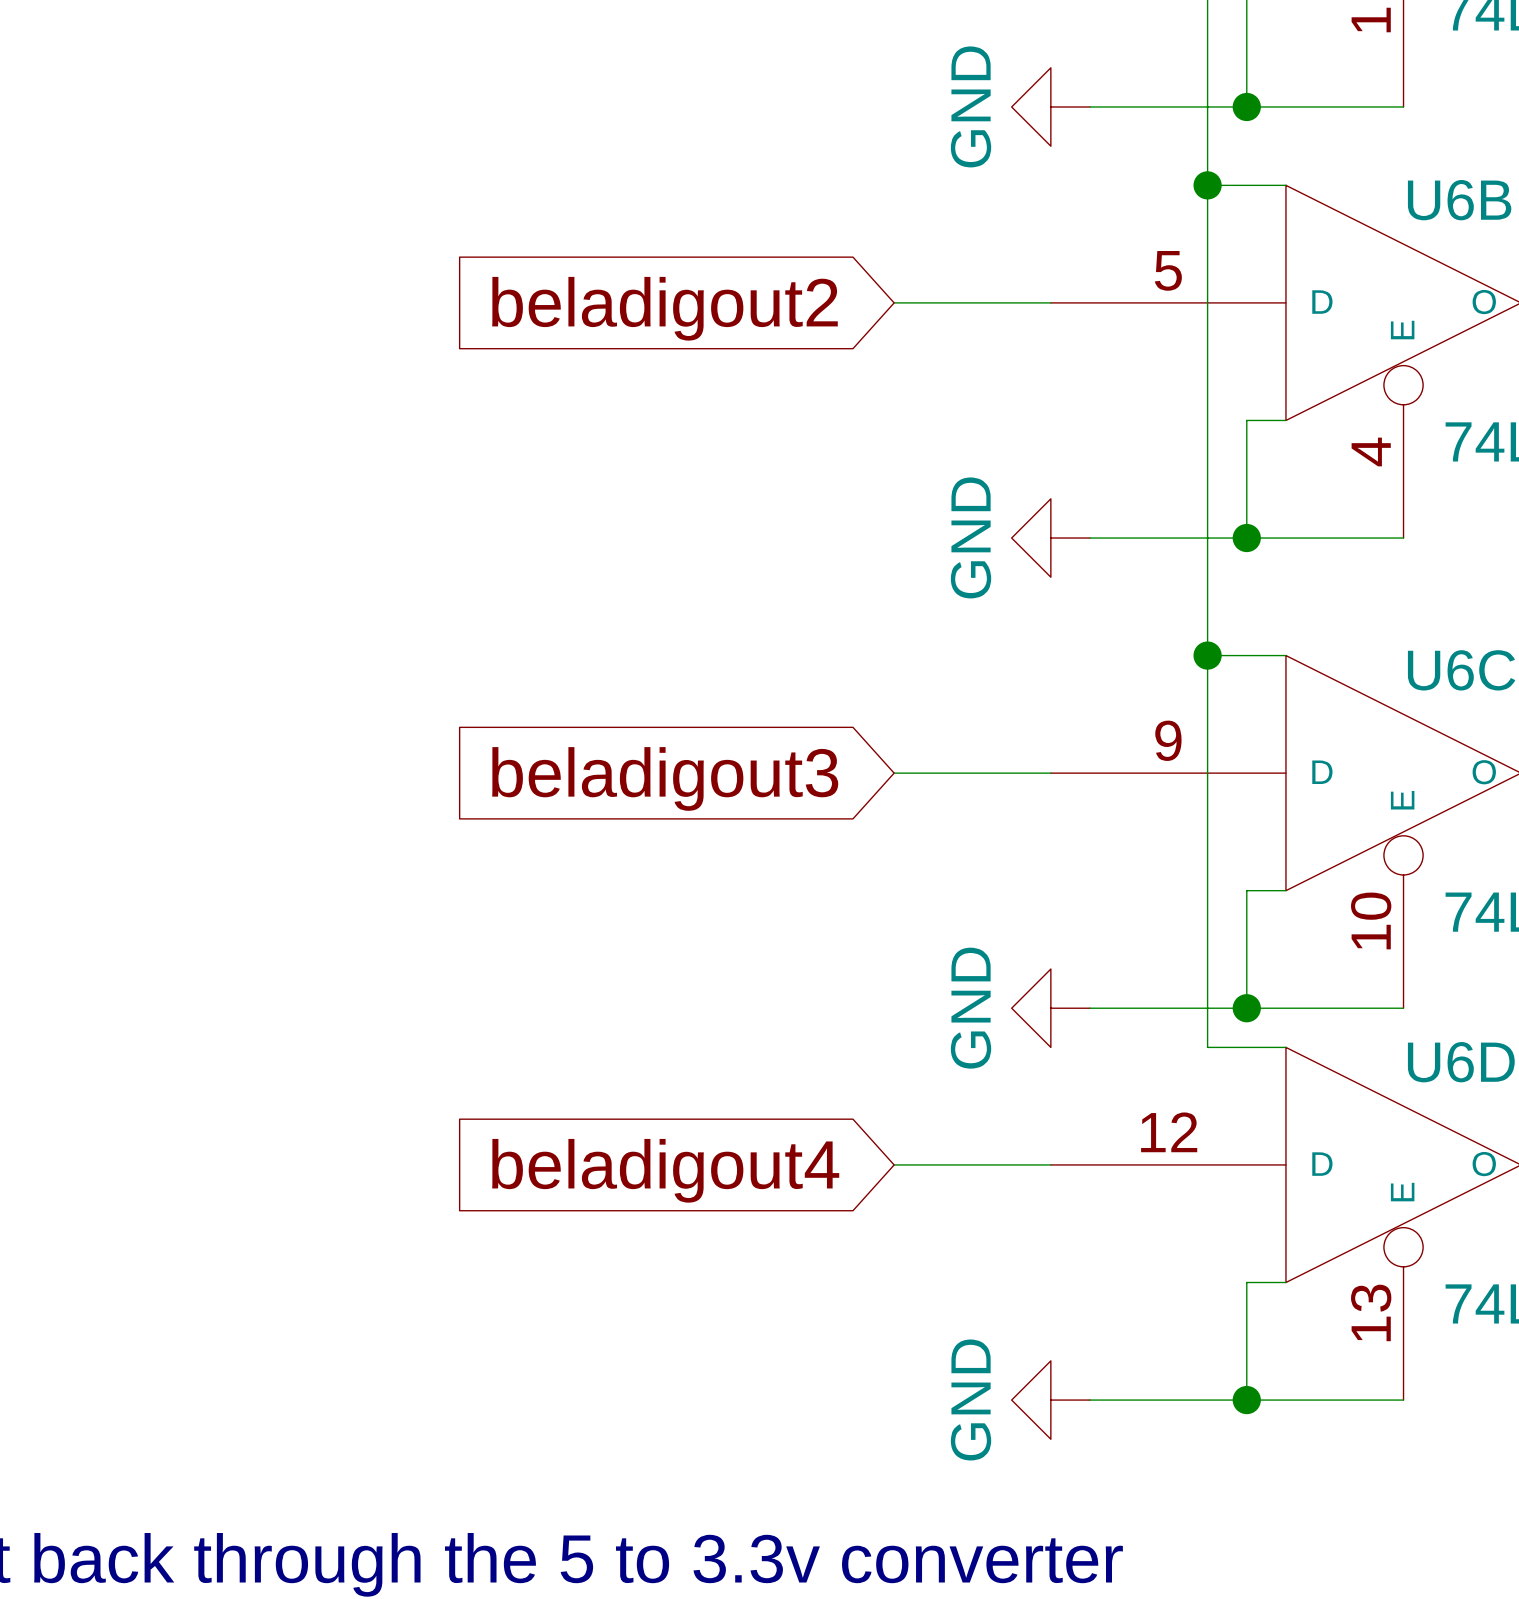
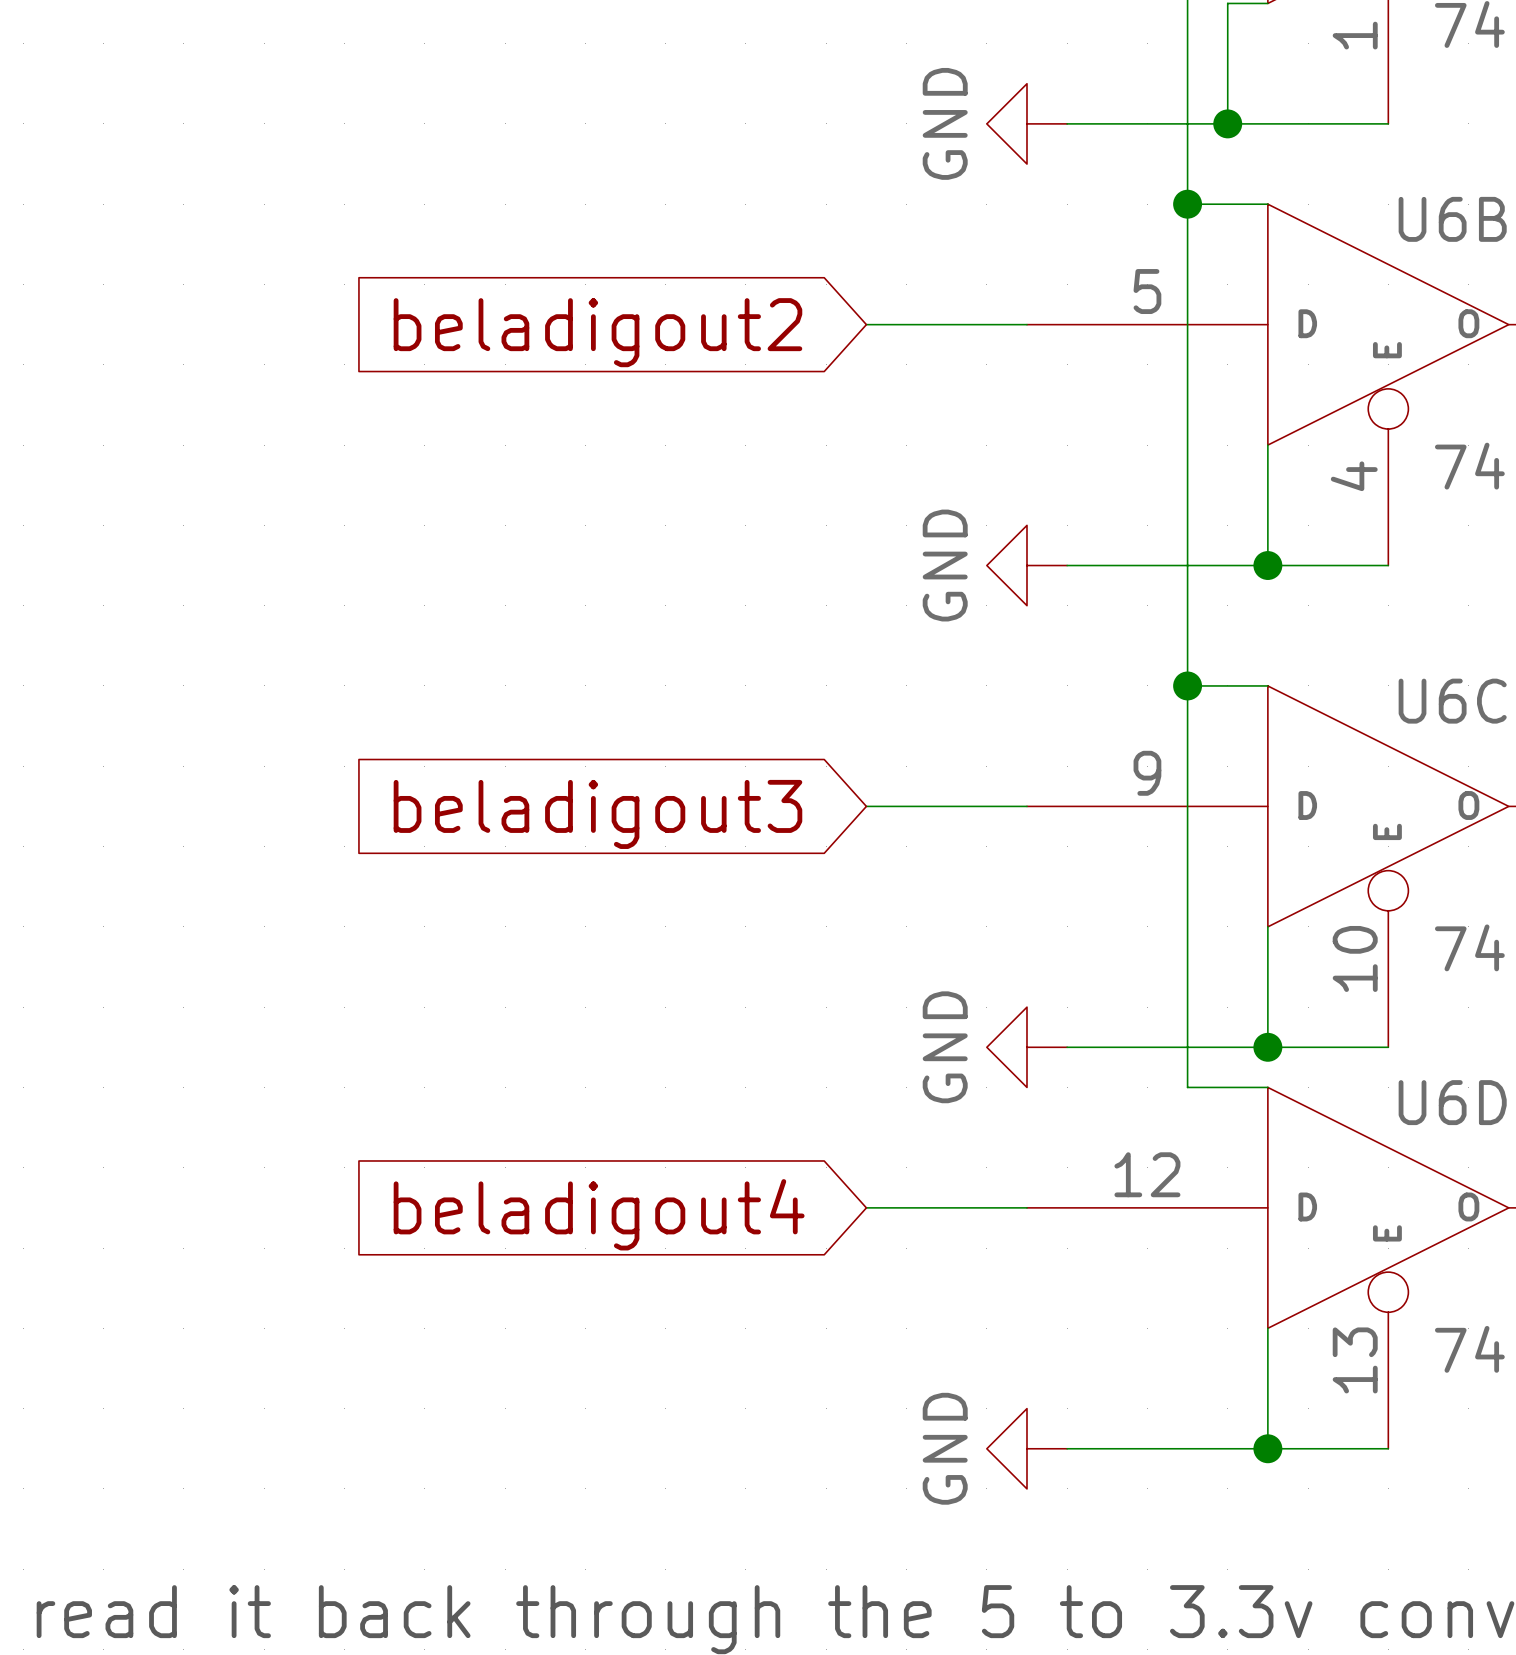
wire: (1285, 420) (1246, 420) (1246, 538) -> (1267, 445) (1267, 565)
junction position: (1246, 538) -> (1267, 565)
wire: (1285, 890) (1246, 890) (1246, 1008) -> (1267, 926) (1267, 1047)
junction position: (1246, 1008) -> (1267, 1047)
wire: (1285, 1282) (1246, 1282) (1246, 1400) -> (1267, 1328) (1267, 1448)
junction position: (1246, 1400) -> (1267, 1448)

